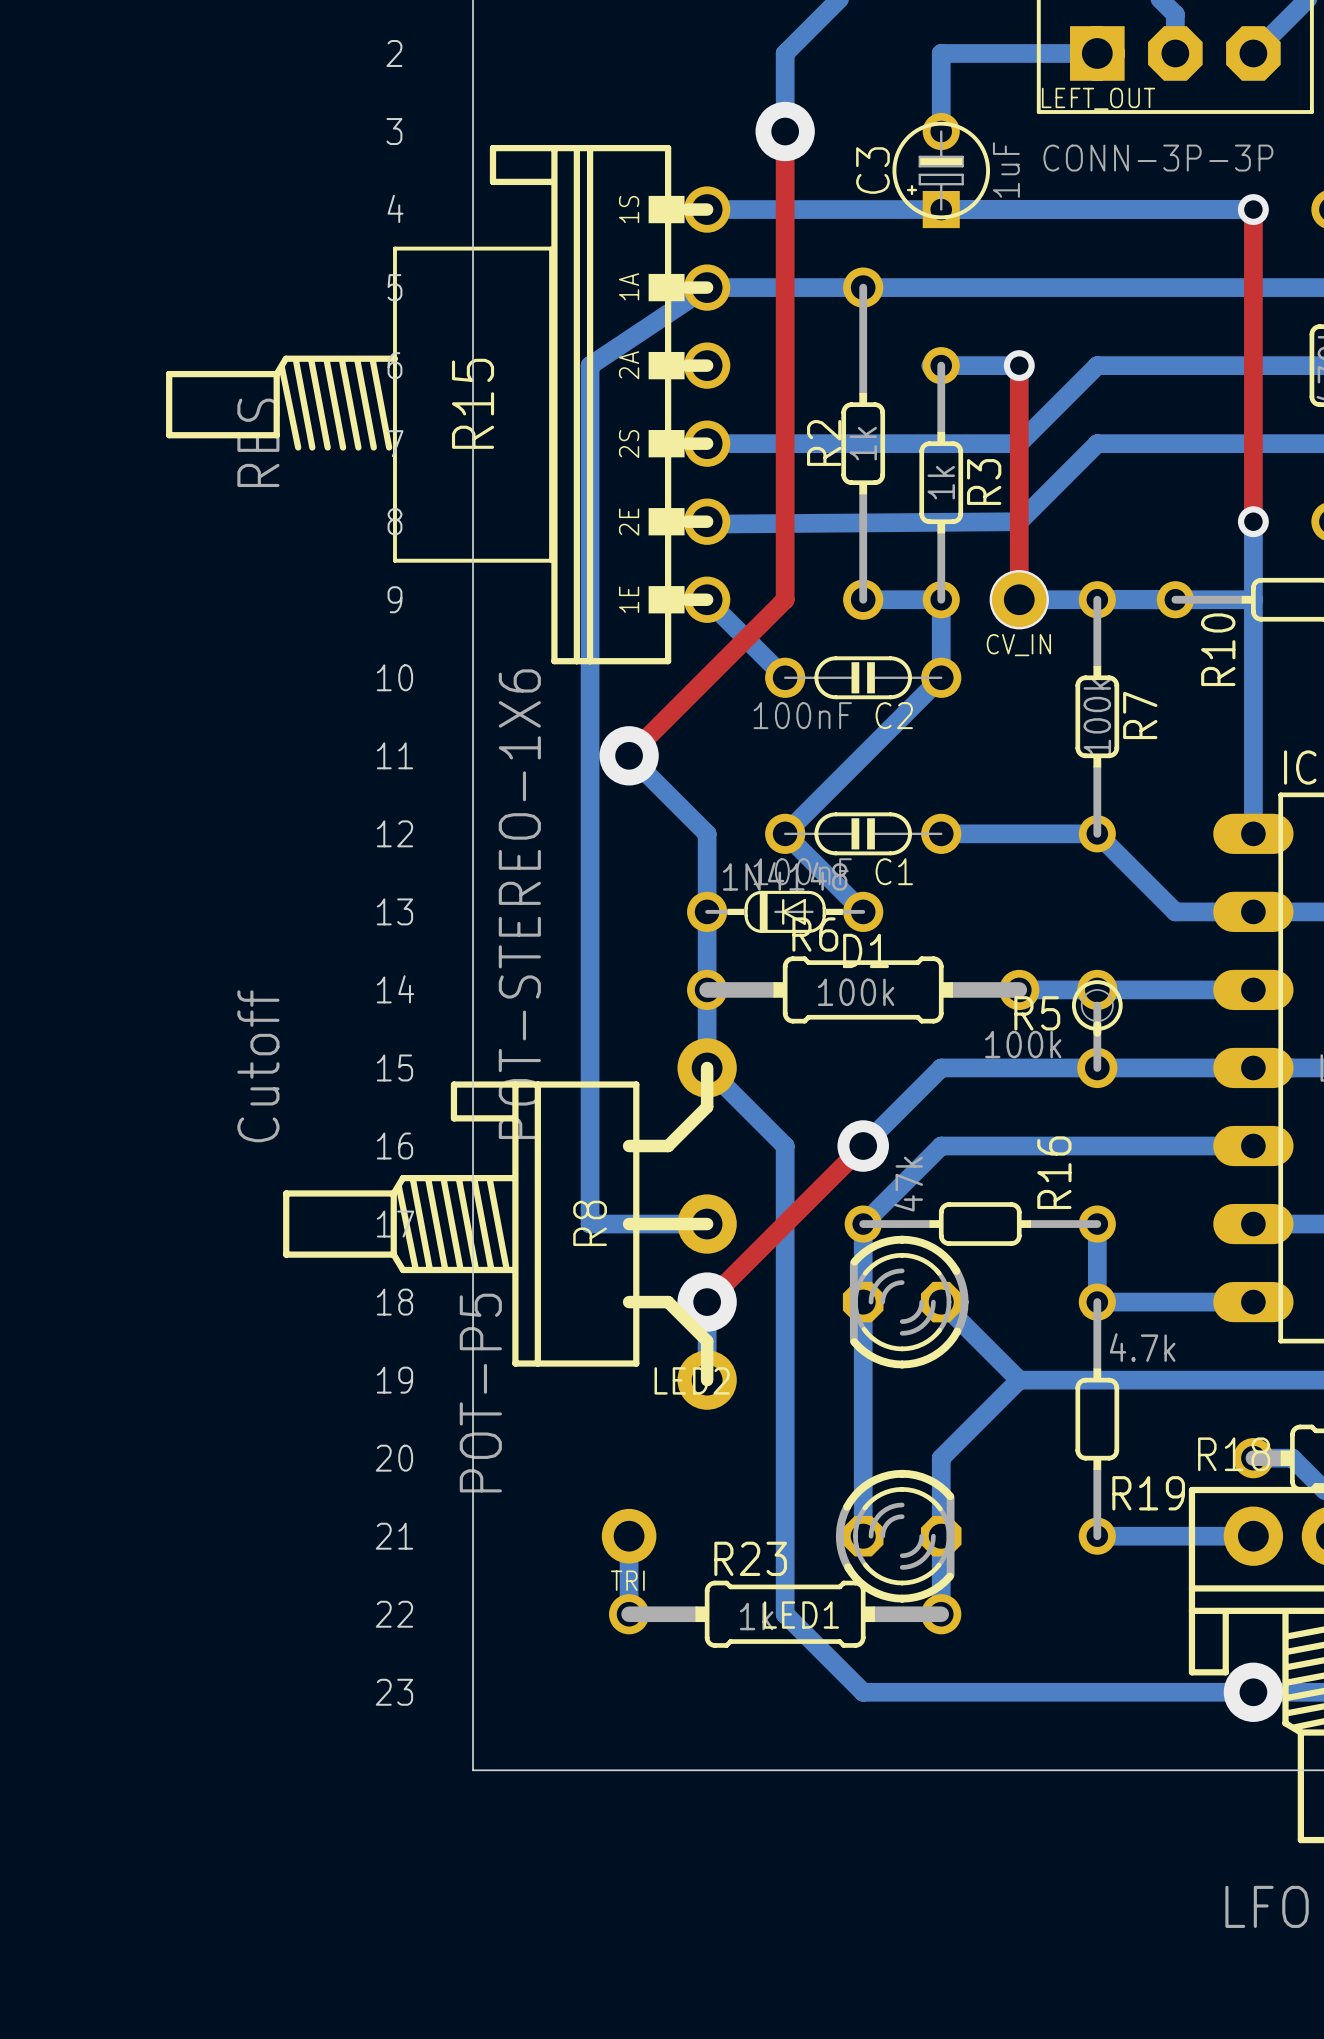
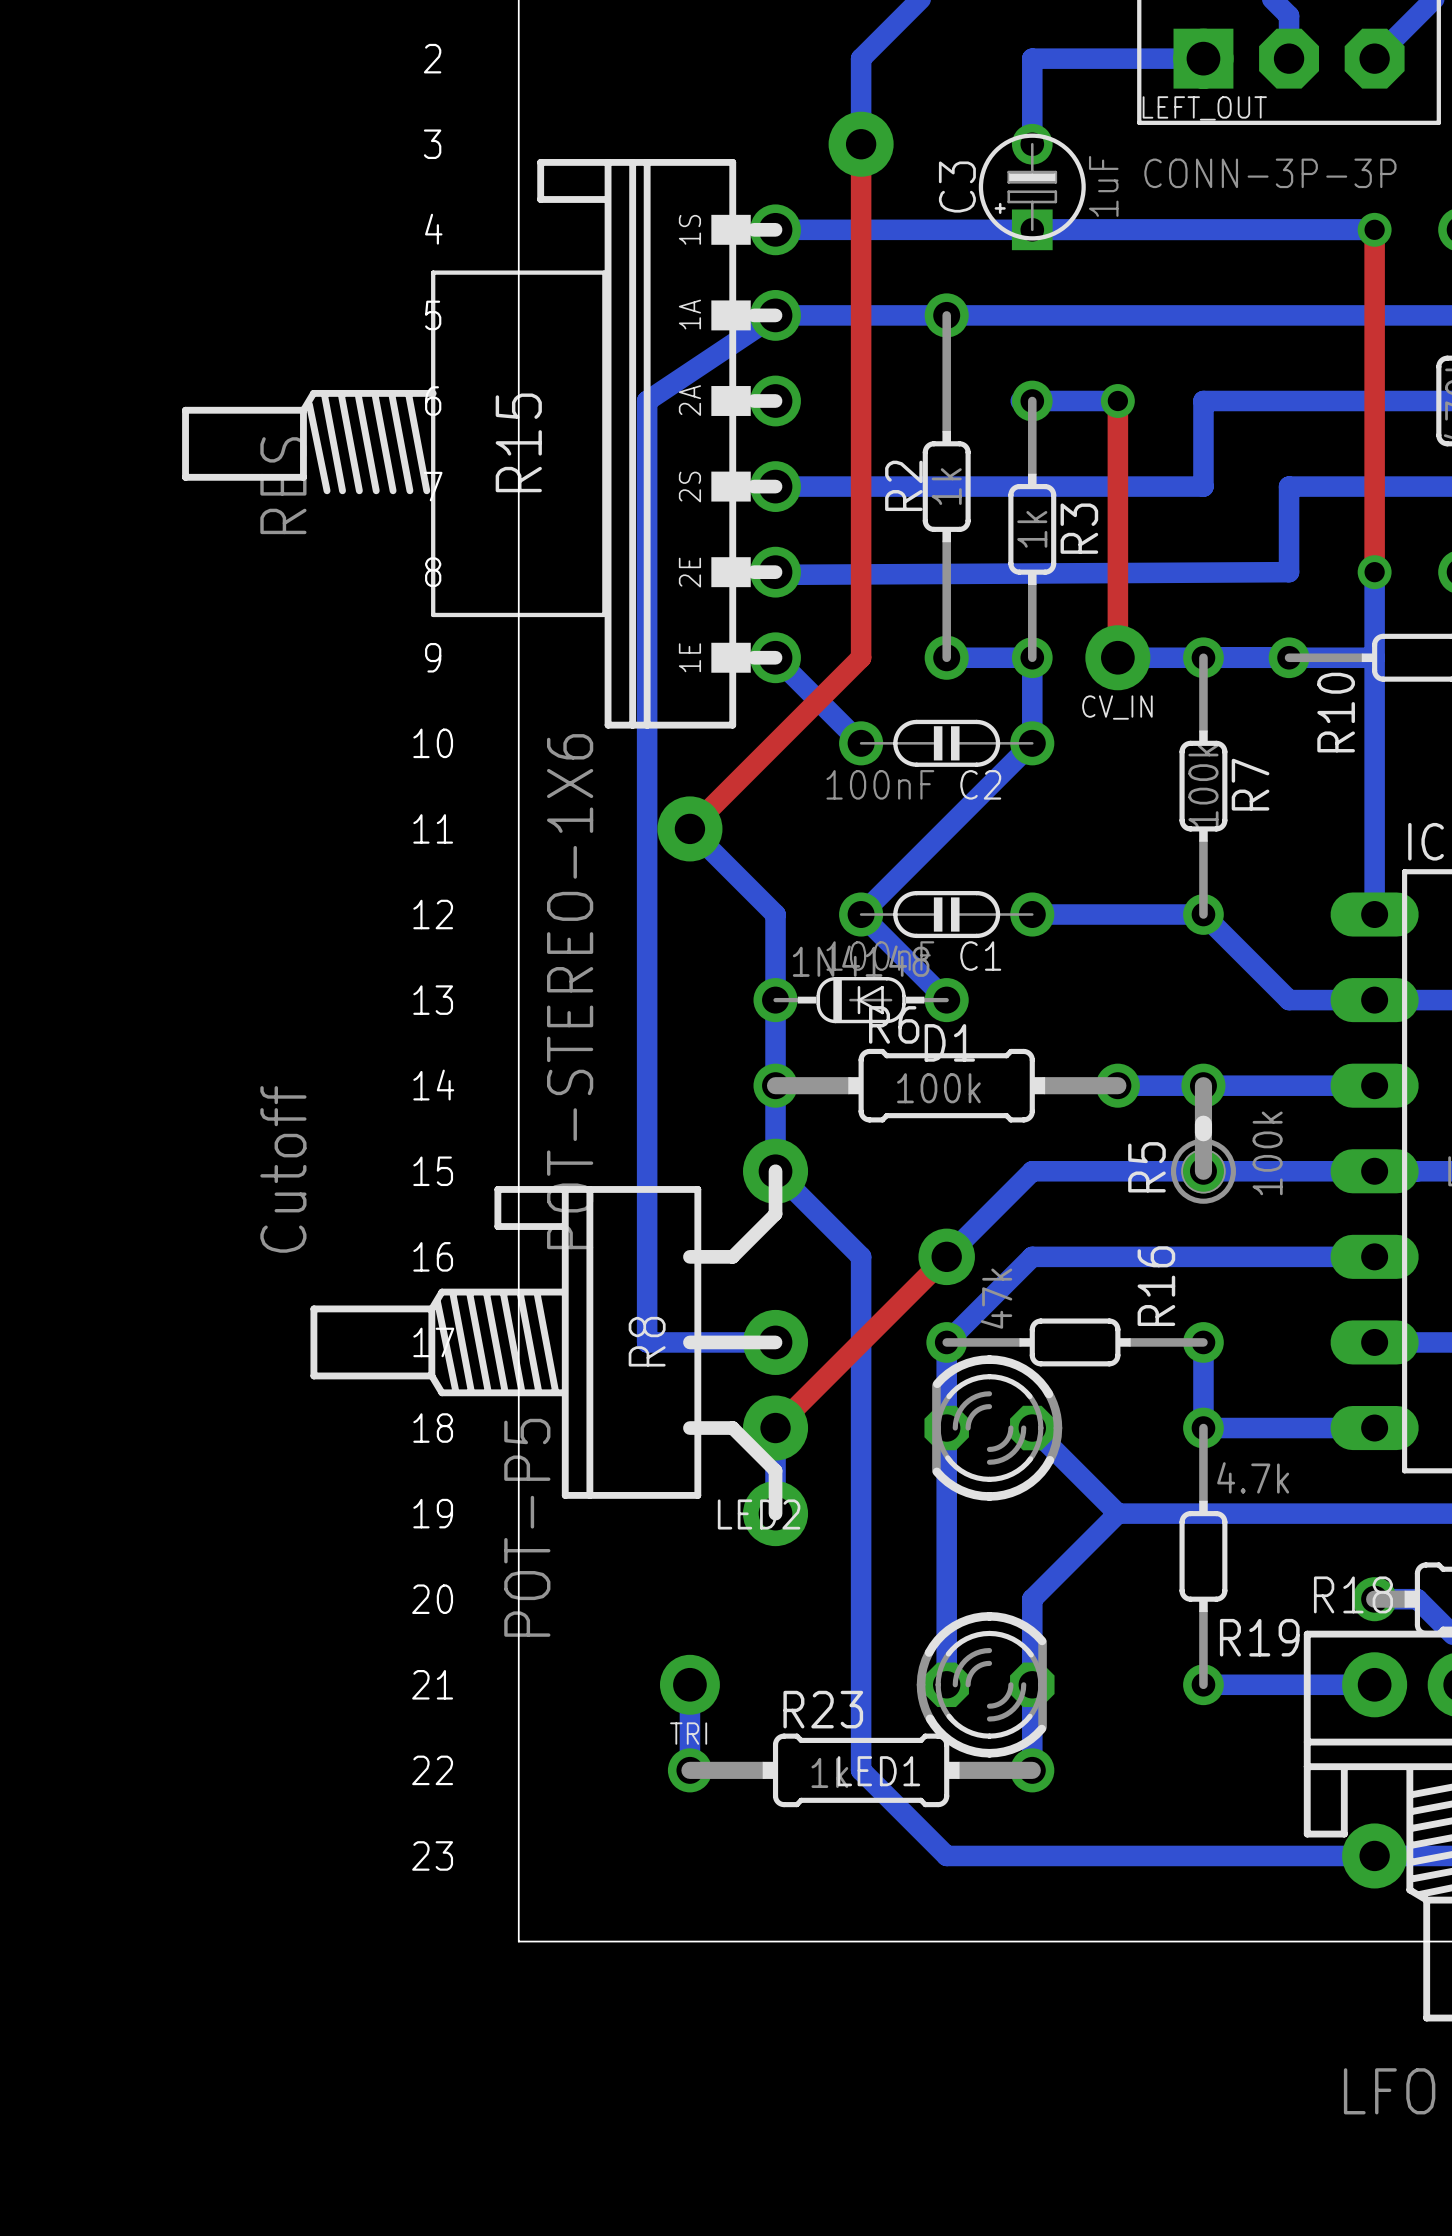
bottom track: (1097, 365) (1019, 443) -> (1203, 400) (1203, 486) (1117, 486)
bottom track: (1175, 443) (1097, 443) (1019, 521) (704, 524) -> (1289, 486) (1289, 572) (772, 574)
R5 footprint: [1071, 969, 1123, 1089] -> [1170, 1063, 1236, 1204]
R5 value position: 100k (1023, 1044) -> 100k (1267, 1153)

